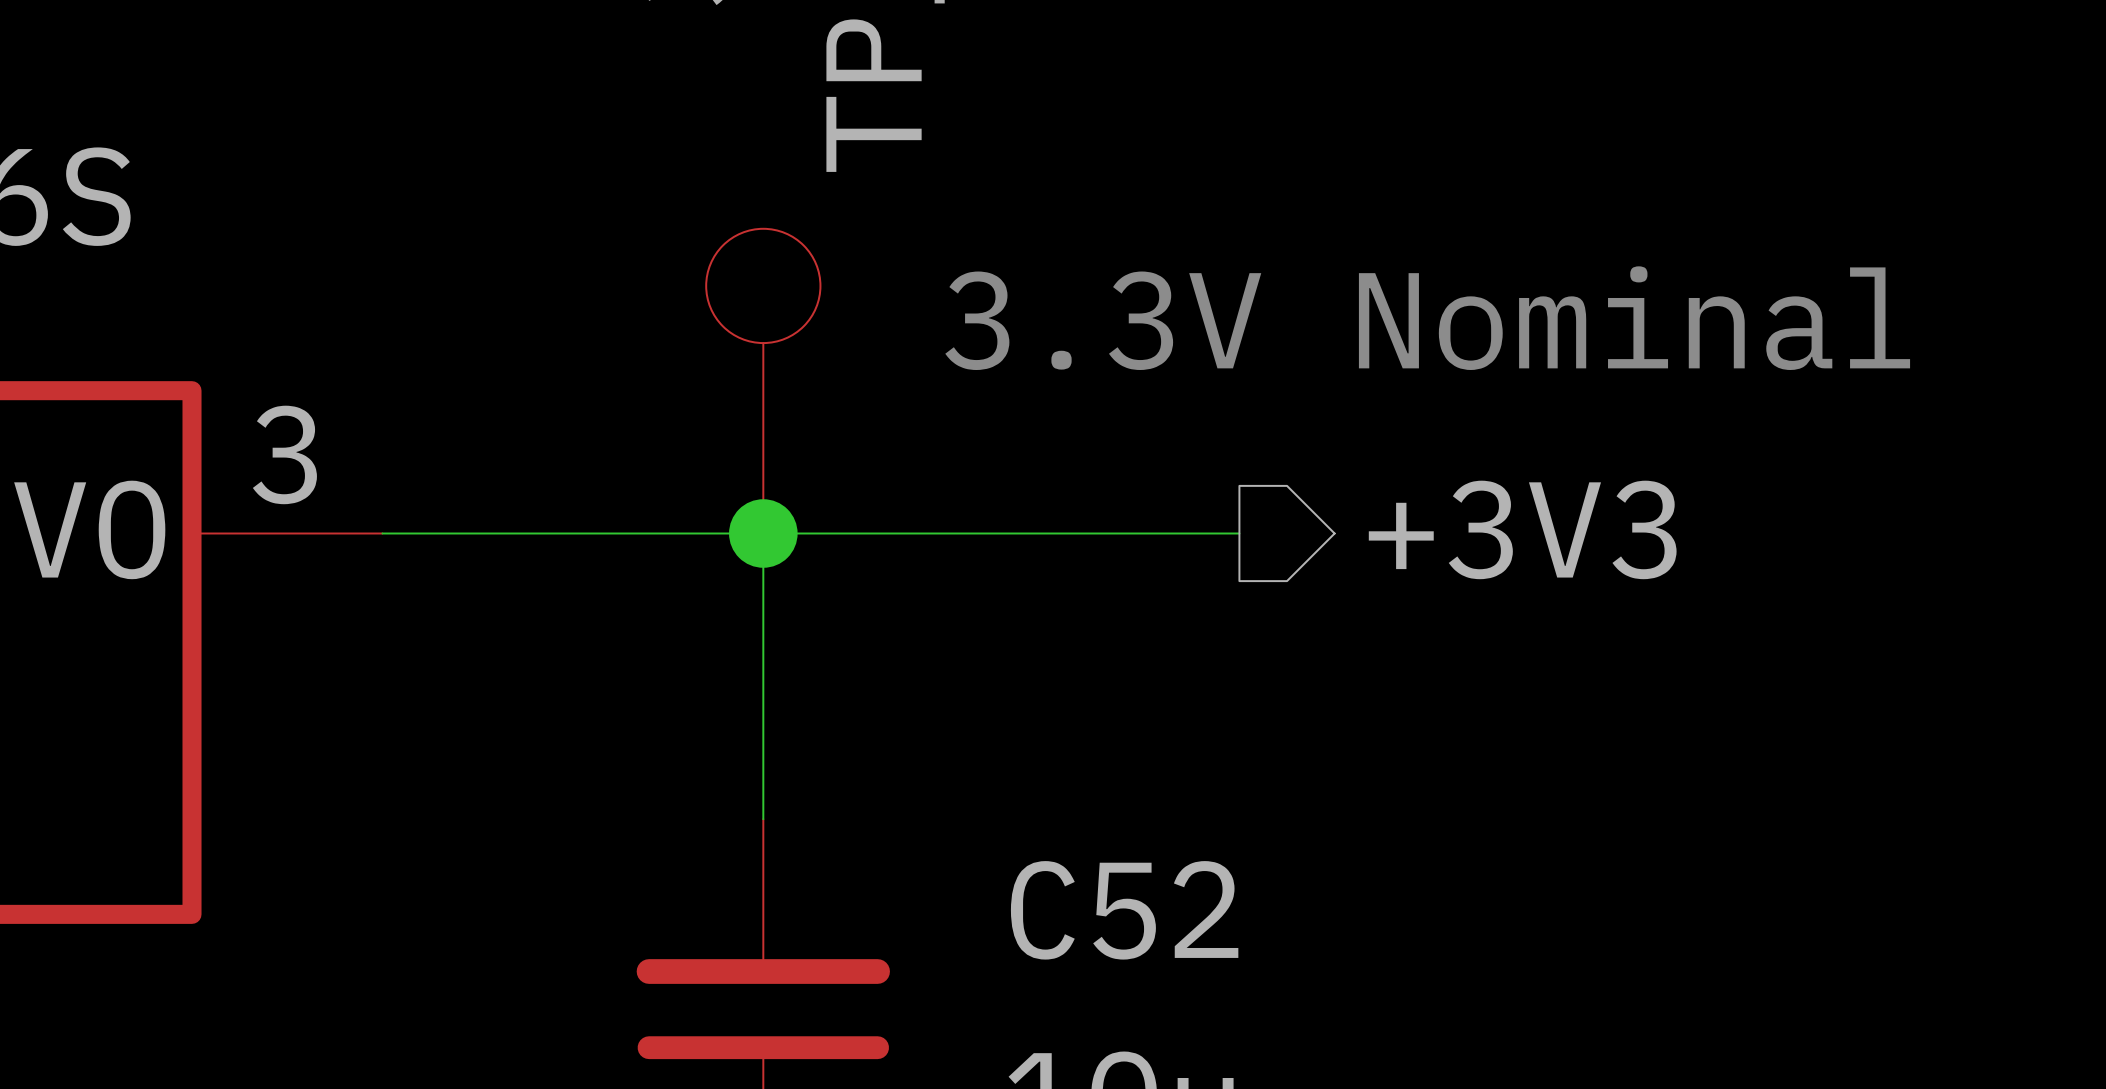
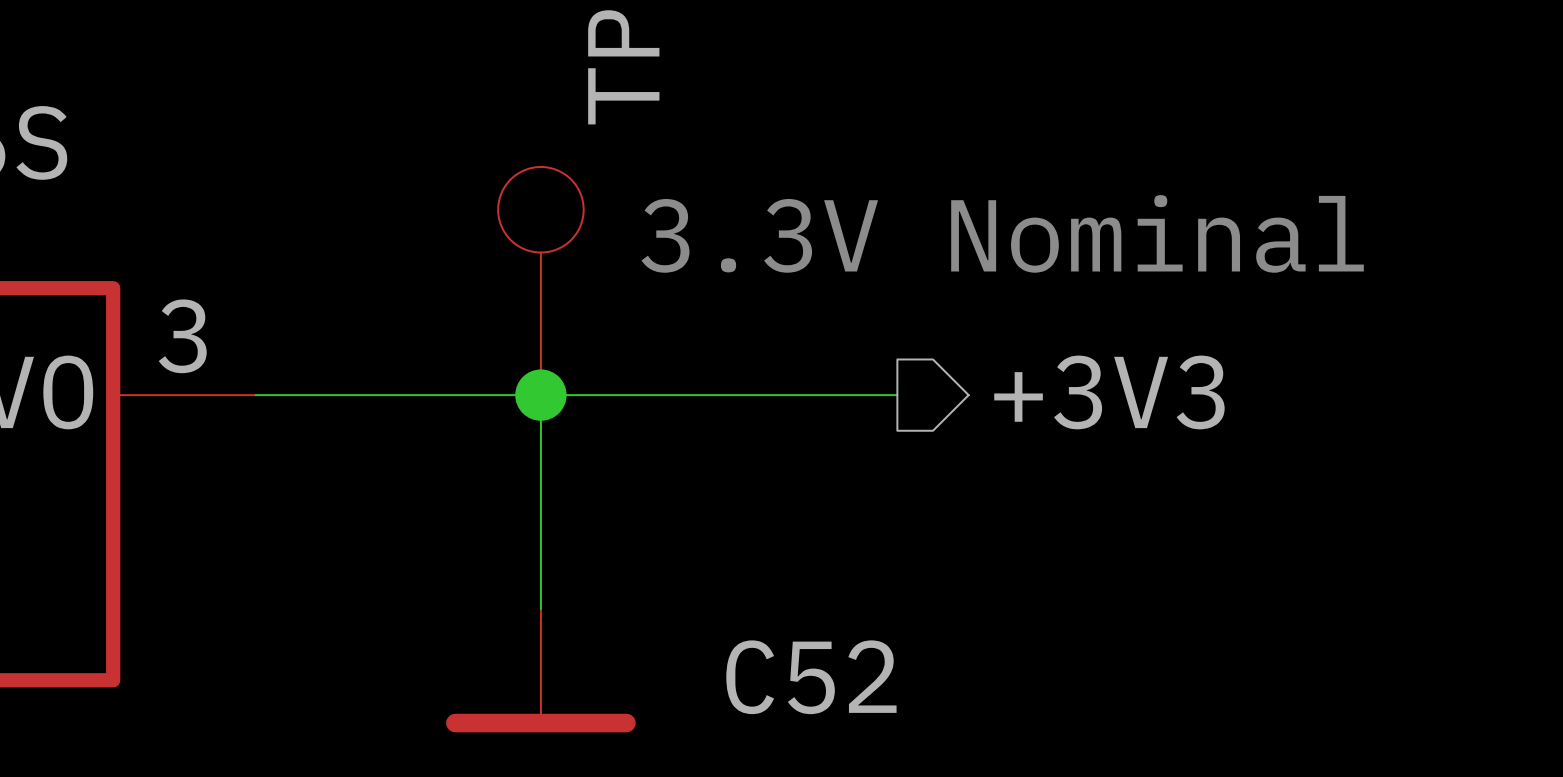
text position: 3.3V Nominal (1427, 318) -> 3.3V Nominal (1002, 233)

